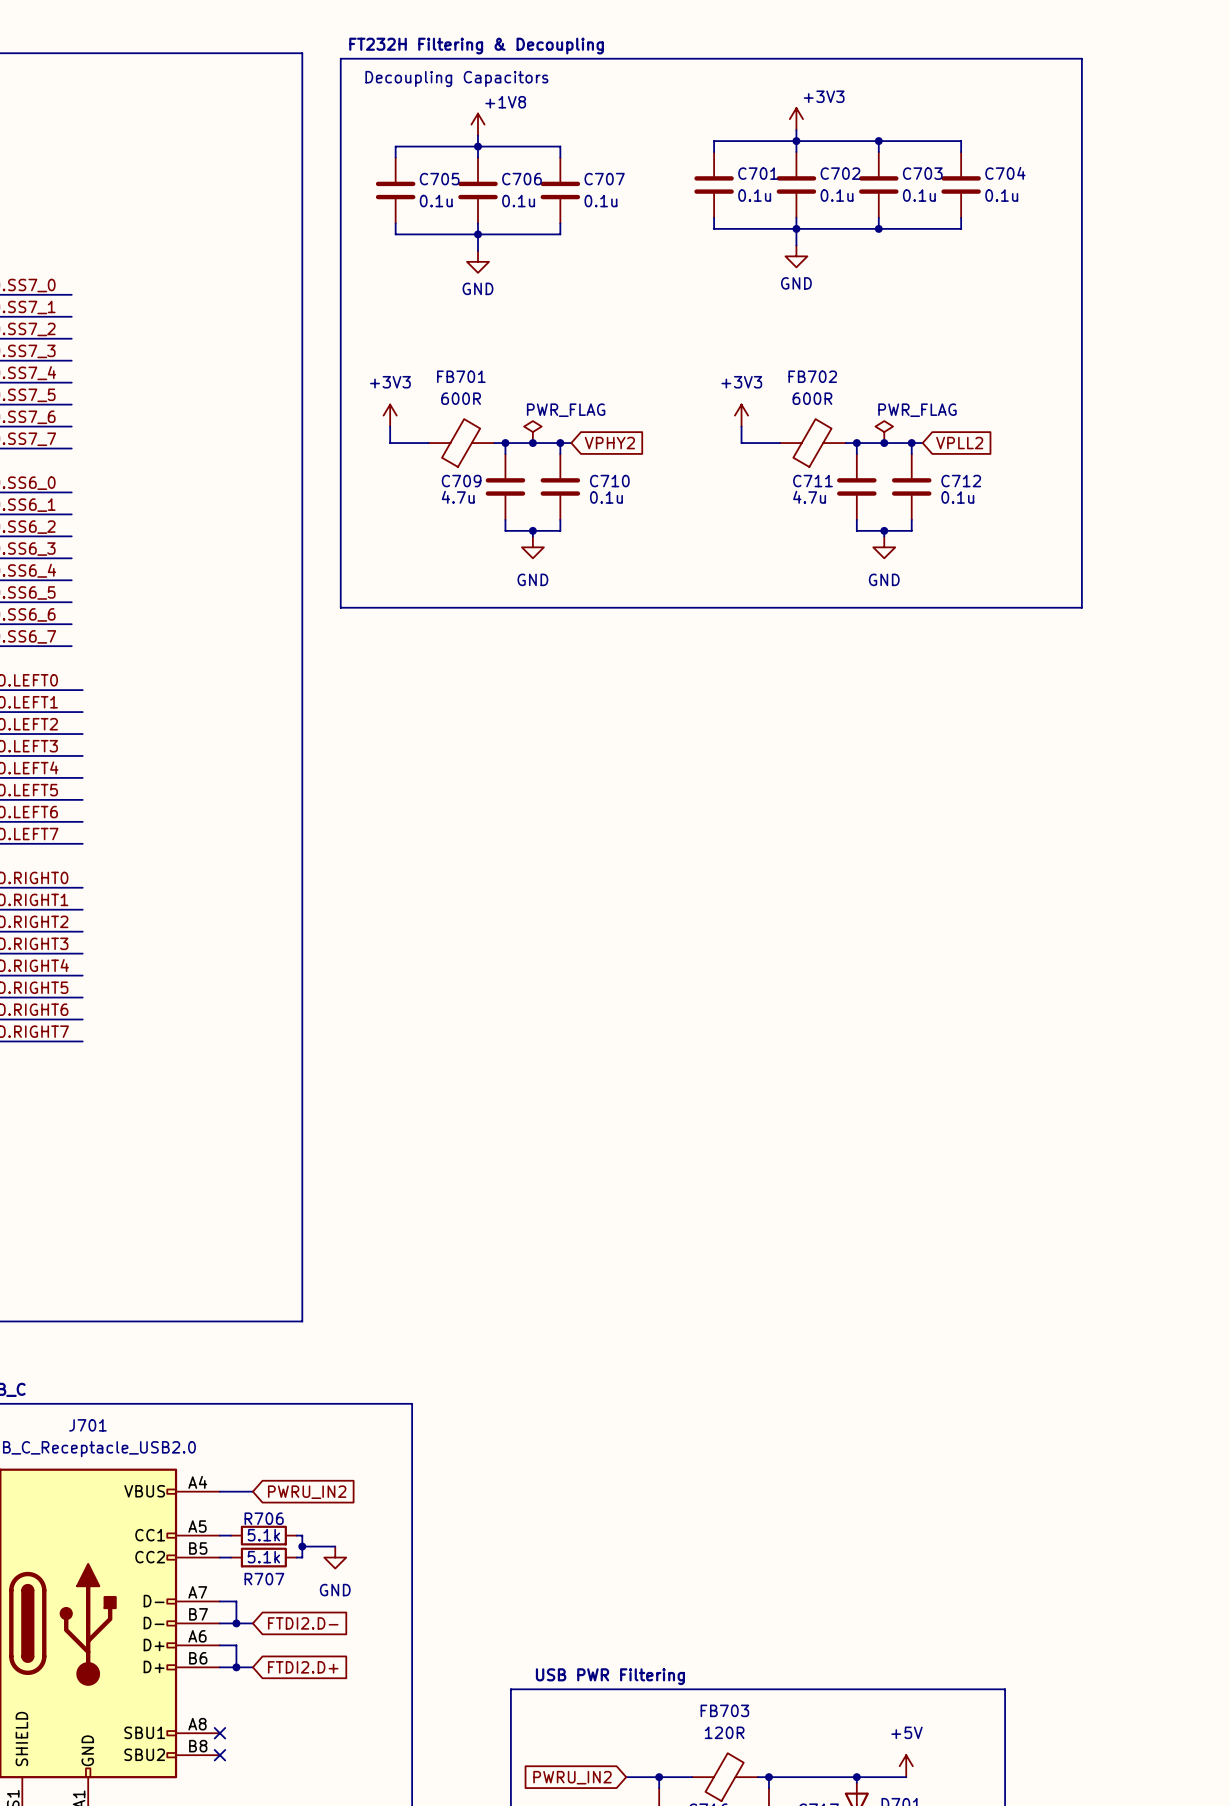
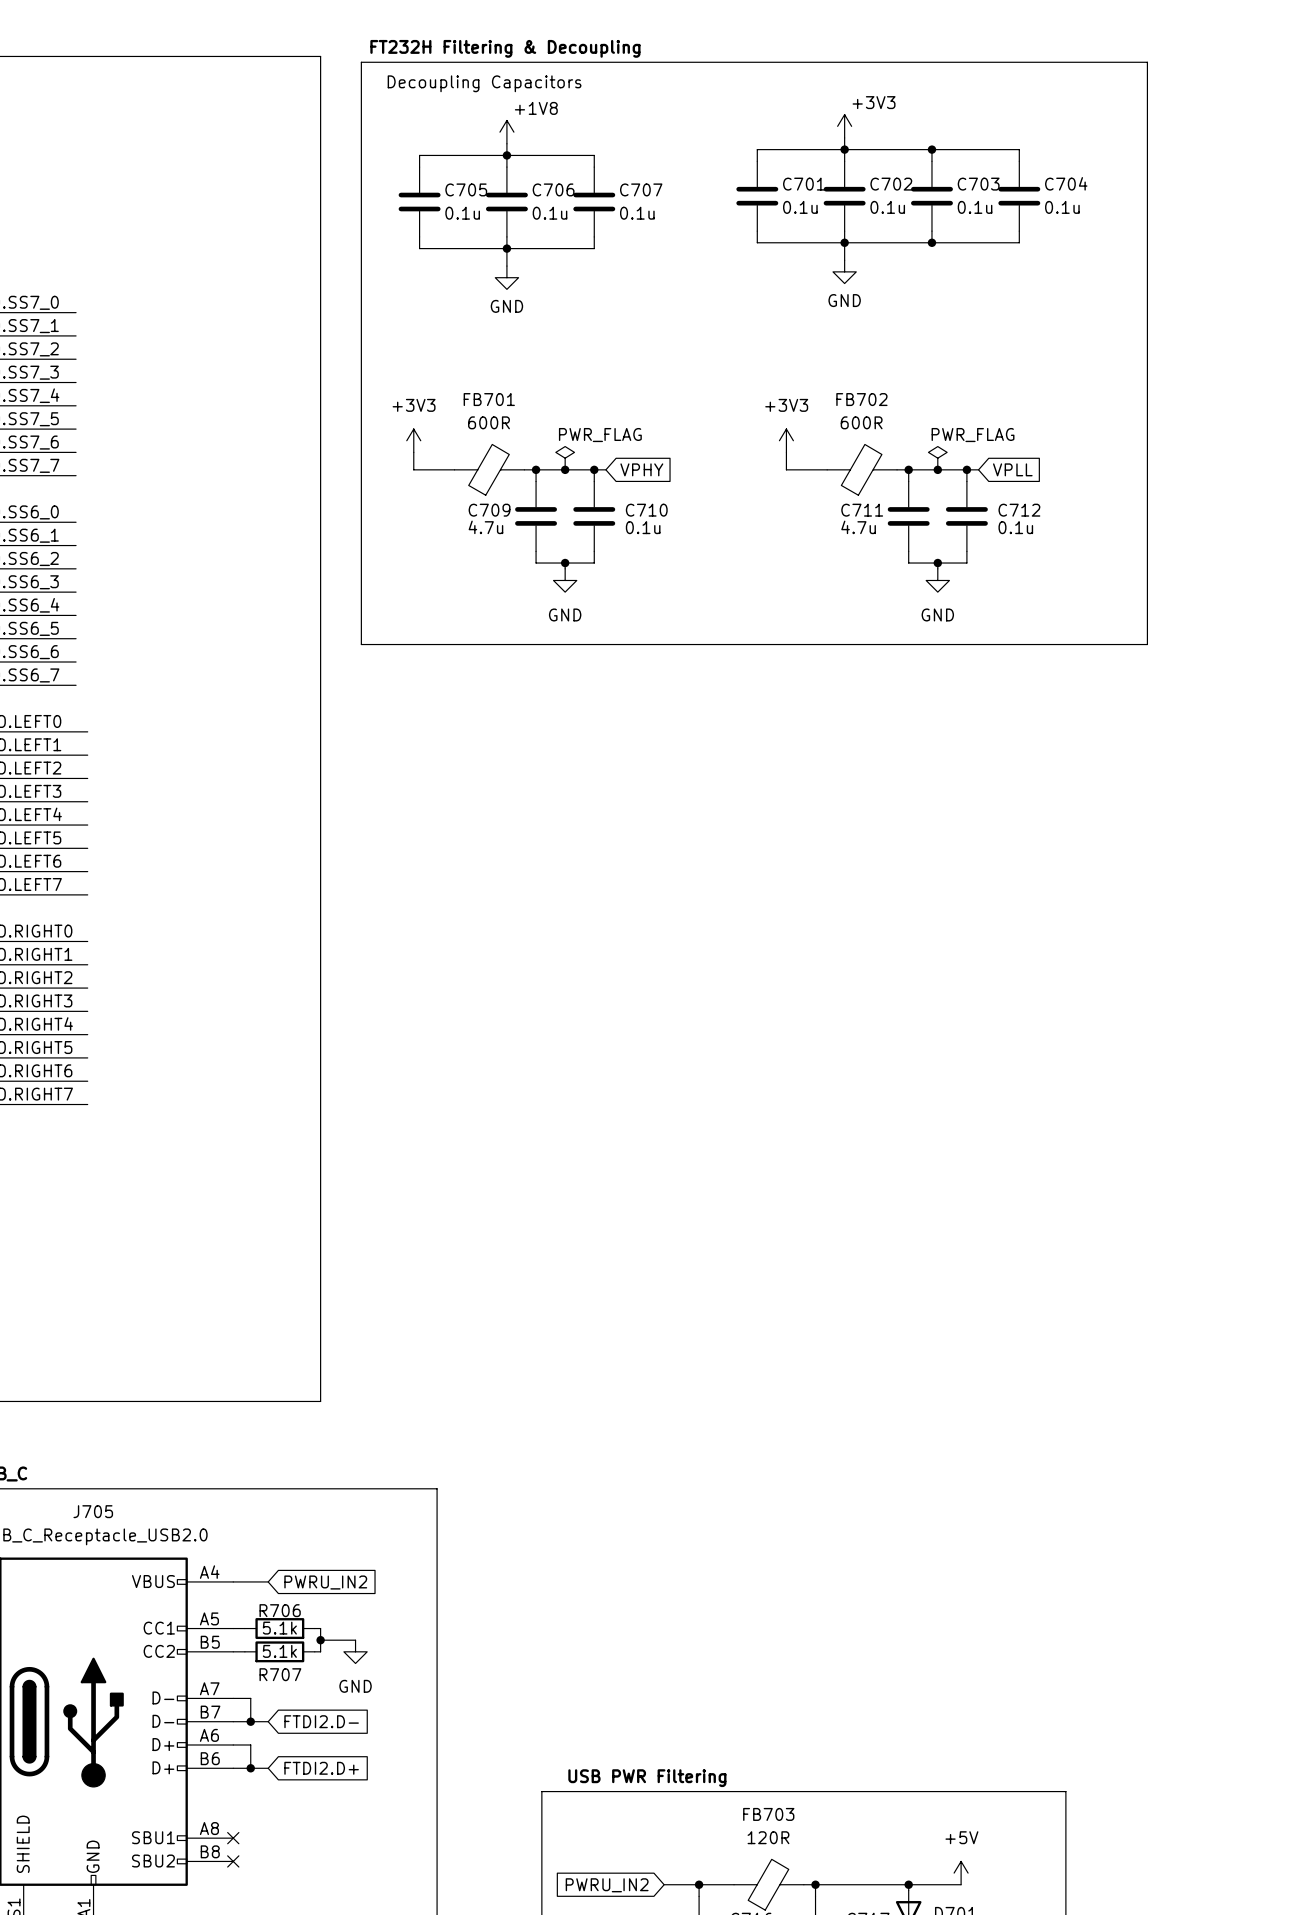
global label: VPHY2 (609, 443) -> VPHY (641, 469)
global label: VPLL2 (959, 443) -> VPLL (1012, 469)
J701 name: J701 (87, 1425) -> J705 (93, 1511)

